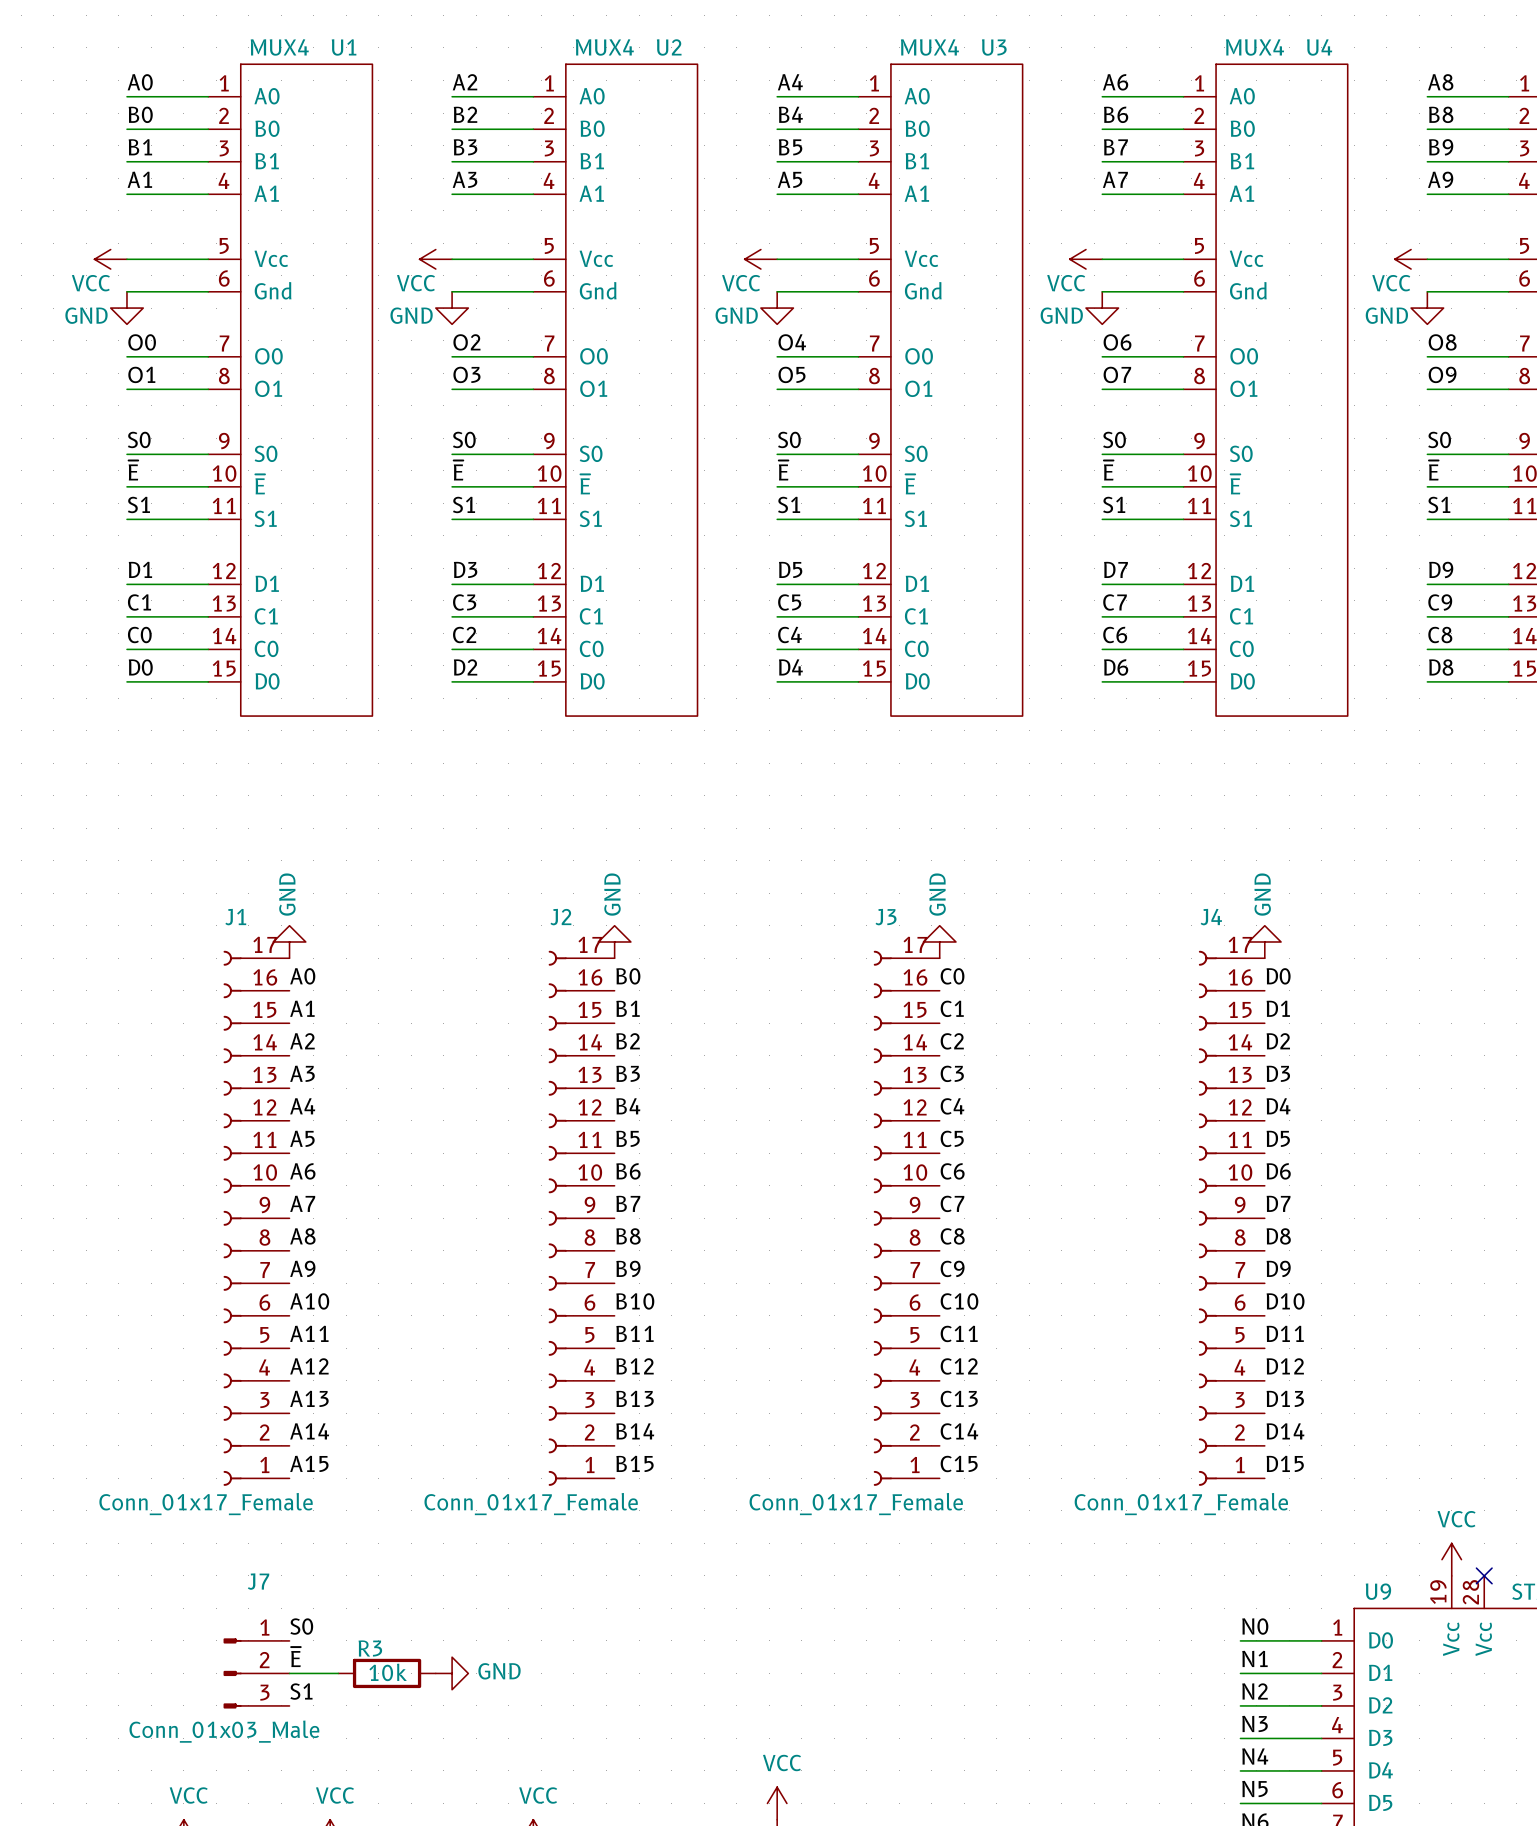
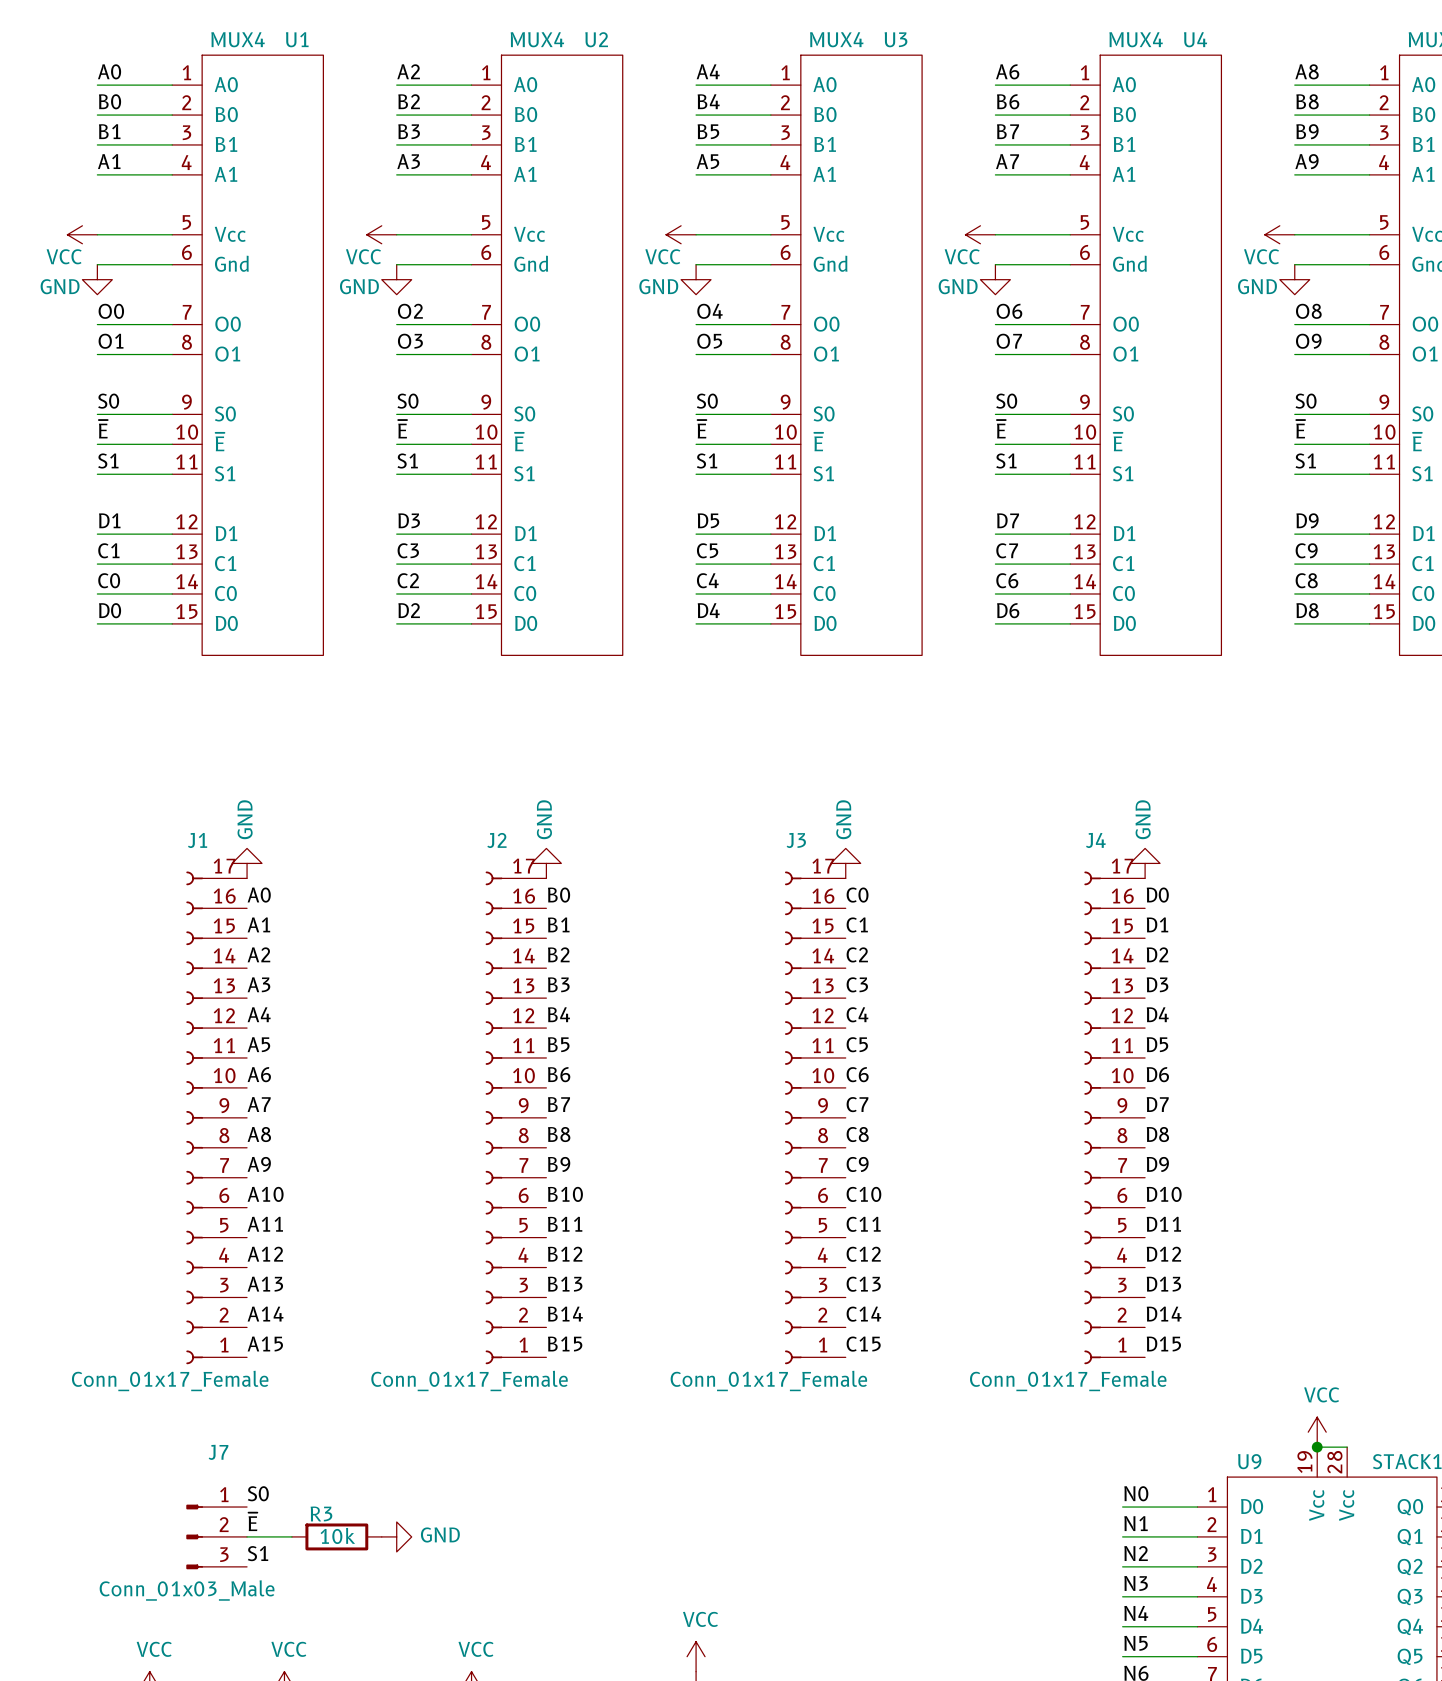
wire: none -> (1317, 1447) (1347, 1447)
junction: none -> (1317, 1447)
no-connect mark: (1484, 1575) -> none

